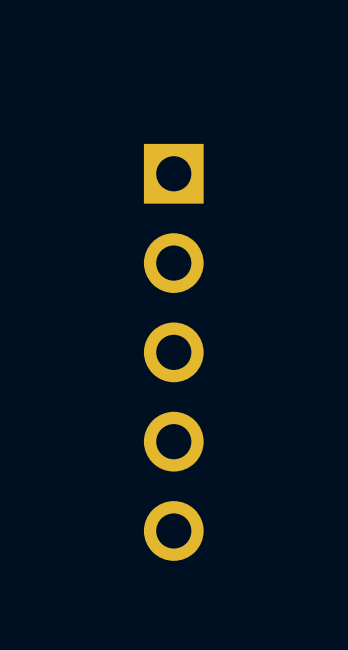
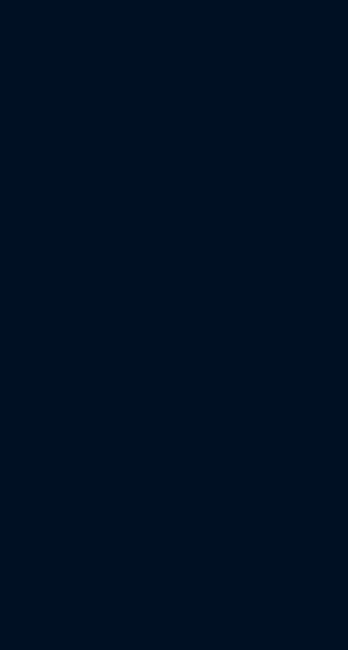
part: (173, 352) -> none

